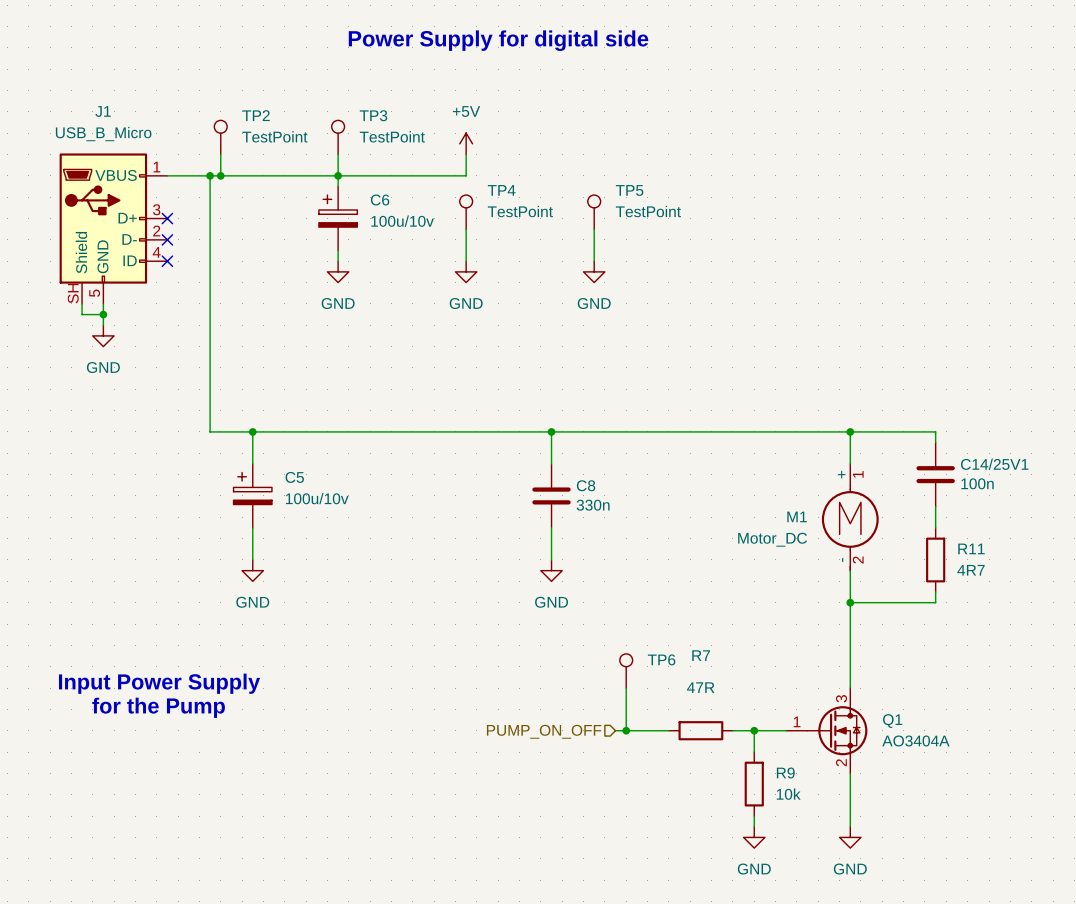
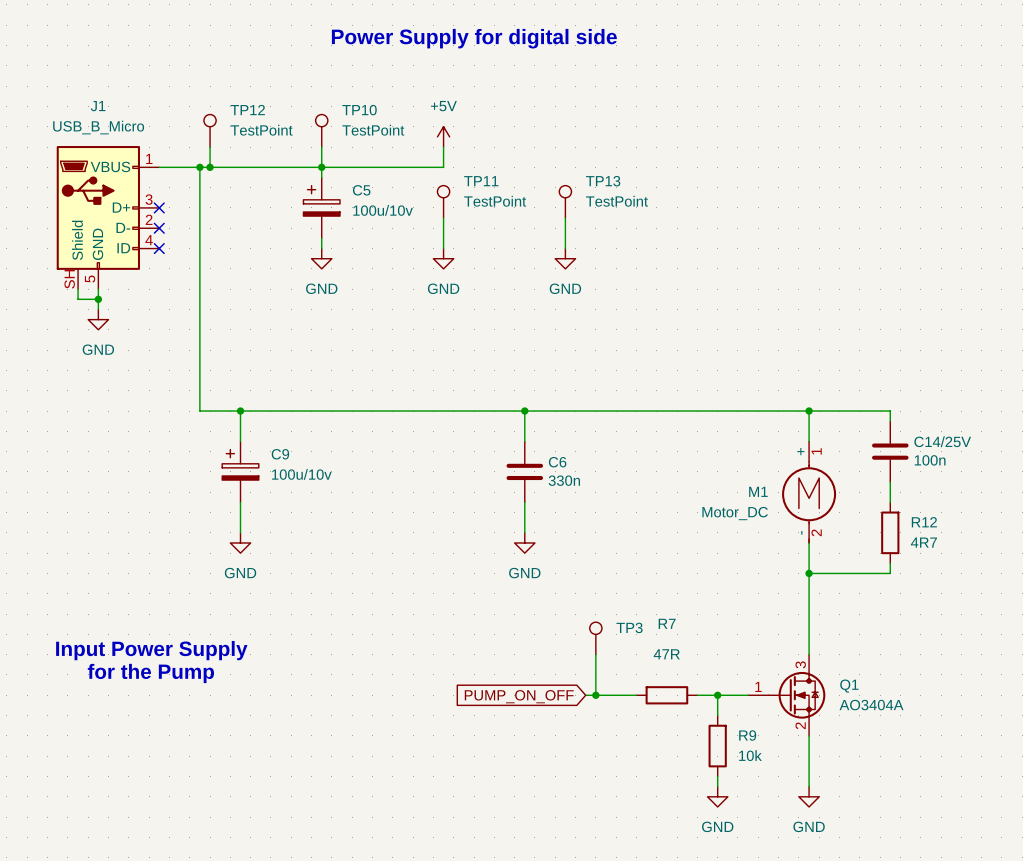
TP2 name: TP2 (256, 115) -> TP12 (247, 110)
TP3 name: TP3 (373, 115) -> TP10 (359, 110)
TP4 name: TP4 (501, 190) -> TP11 (481, 181)
TP5 name: TP5 (629, 190) -> TP13 (603, 181)
C6 name: C6 (380, 200) -> C5 (361, 190)
C14/25V1 name: C14/25V1 (994, 464) -> C14/25V (942, 441)
C5 name: C5 (294, 477) -> C9 (280, 454)
C8 name: C8 (586, 485) -> C6 (557, 462)
R11 name: R11 (971, 548) -> R12 (924, 522)
TP6 name: TP6 (661, 659) -> TP3 (629, 627)
hierarchical label: PUMP_ON_OFF (544, 731) -> none
global label: none -> PUMP_ON_OFF (519, 696)

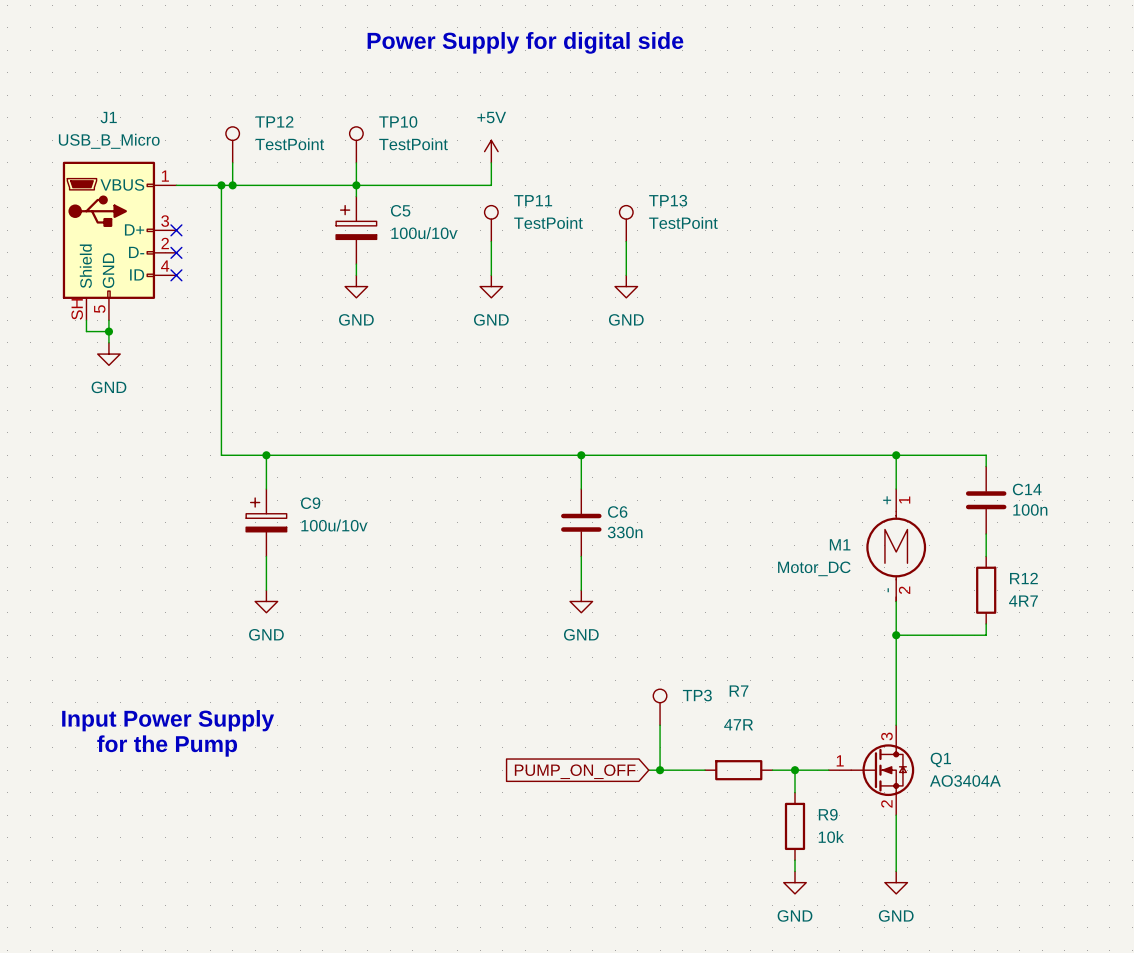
C14/25V name: C14/25V (942, 441) -> C14 (1027, 489)

